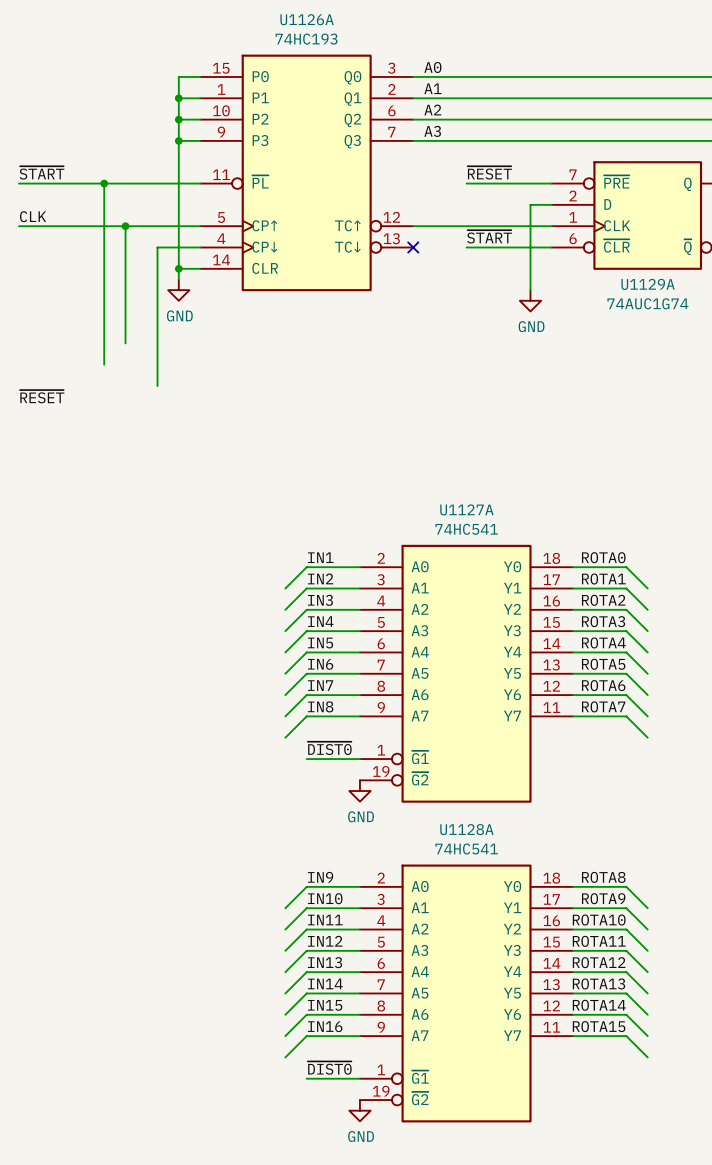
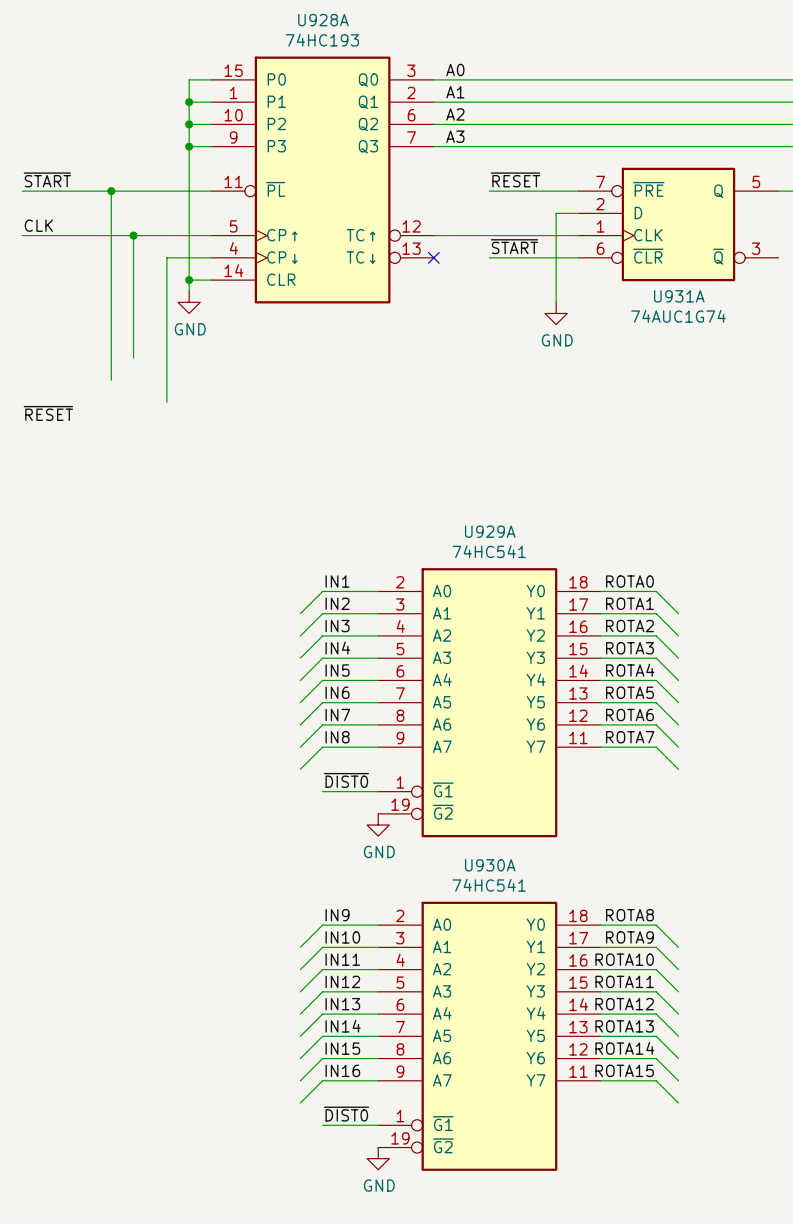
U1126A name: U1126A (307, 19) -> U928A (323, 20)
U1129A name: U1129A (648, 284) -> U931A (679, 296)
U1127A name: U1127A (466, 509) -> U929A (490, 531)
U1128A name: U1128A (466, 829) -> U930A (490, 865)

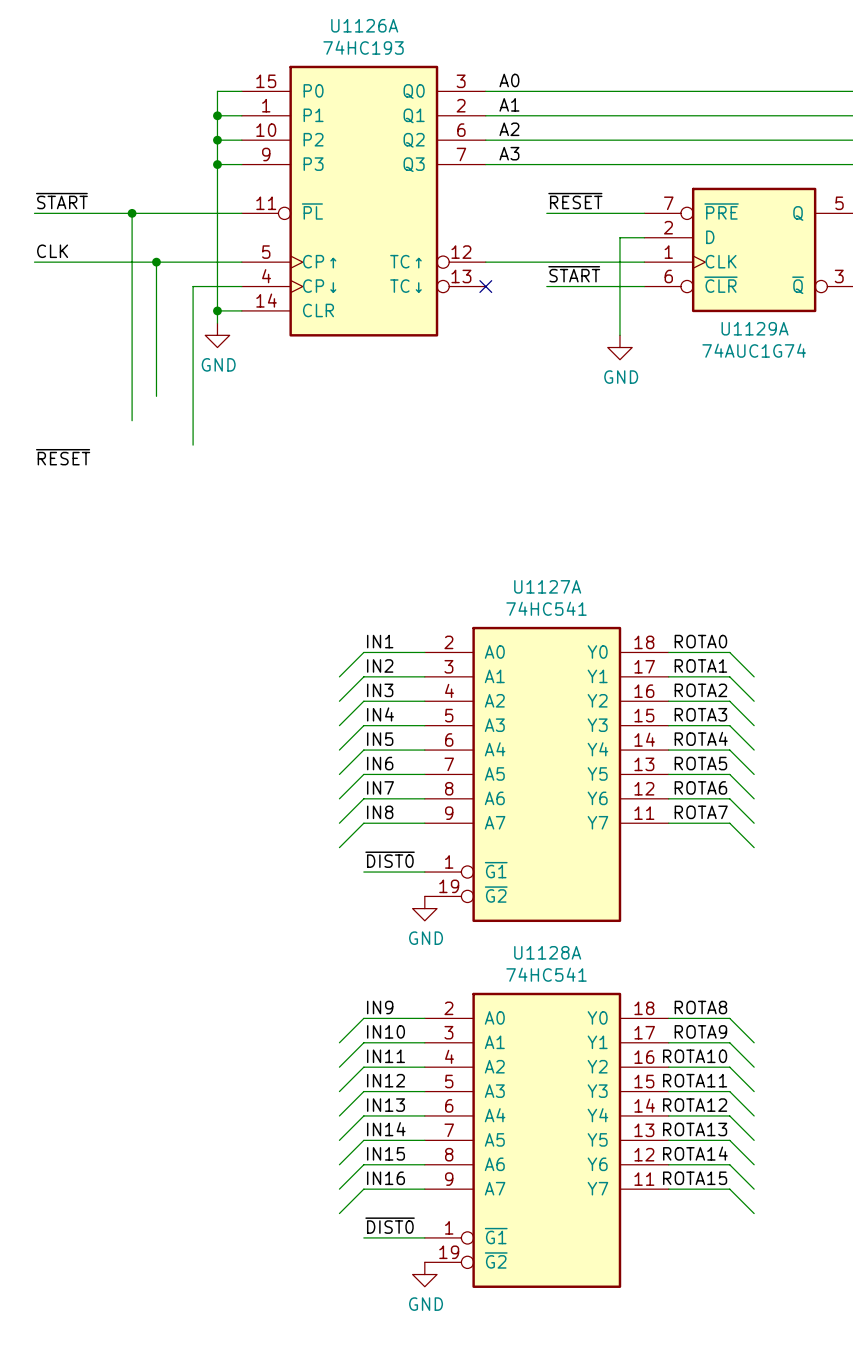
U928A name: U928A (323, 20) -> U1126A (364, 25)
U931A name: U931A (679, 296) -> U1129A (755, 328)
U929A name: U929A (490, 531) -> U1127A (547, 586)
U930A name: U930A (490, 865) -> U1128A (547, 952)

